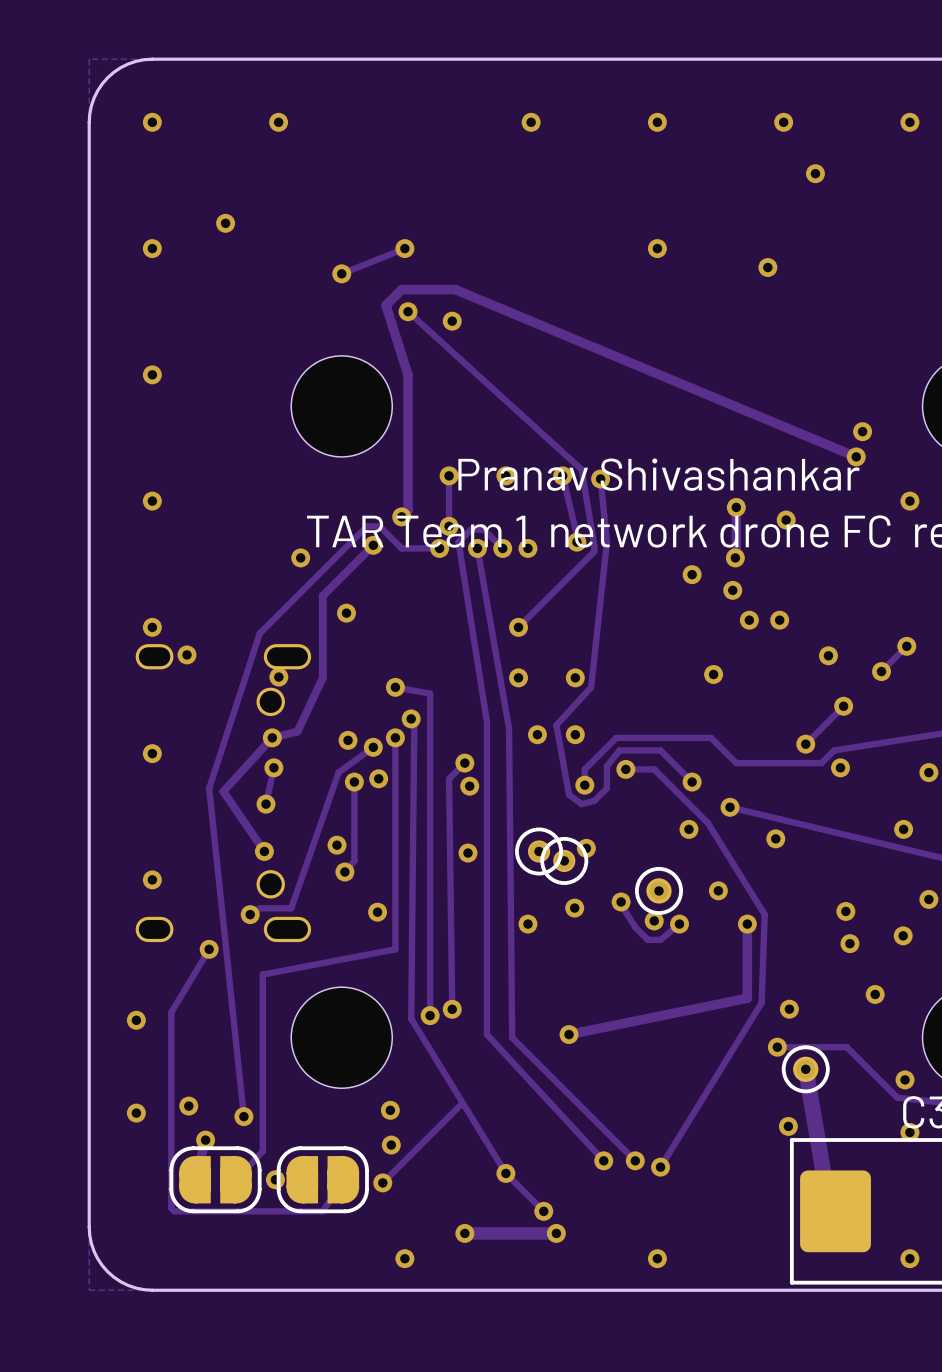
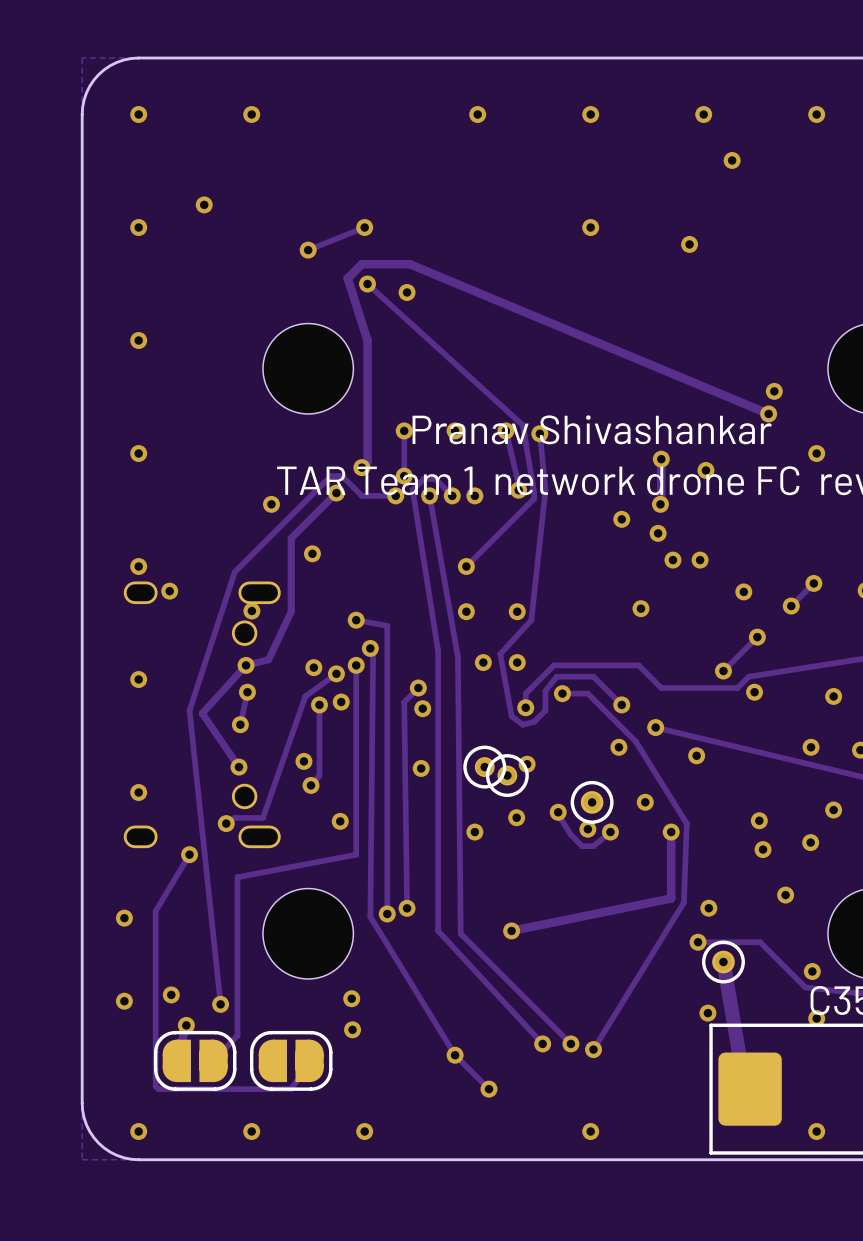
track: (461, 1104) (382, 1182) -> none
via: (275, 1179) -> none
via: (382, 1182) -> none
via: (464, 1233) -> none
track: (556, 1233) (464, 1233) -> none
via: (556, 1233) -> none
via: none -> (138, 1131)
via: none -> (251, 1131)

